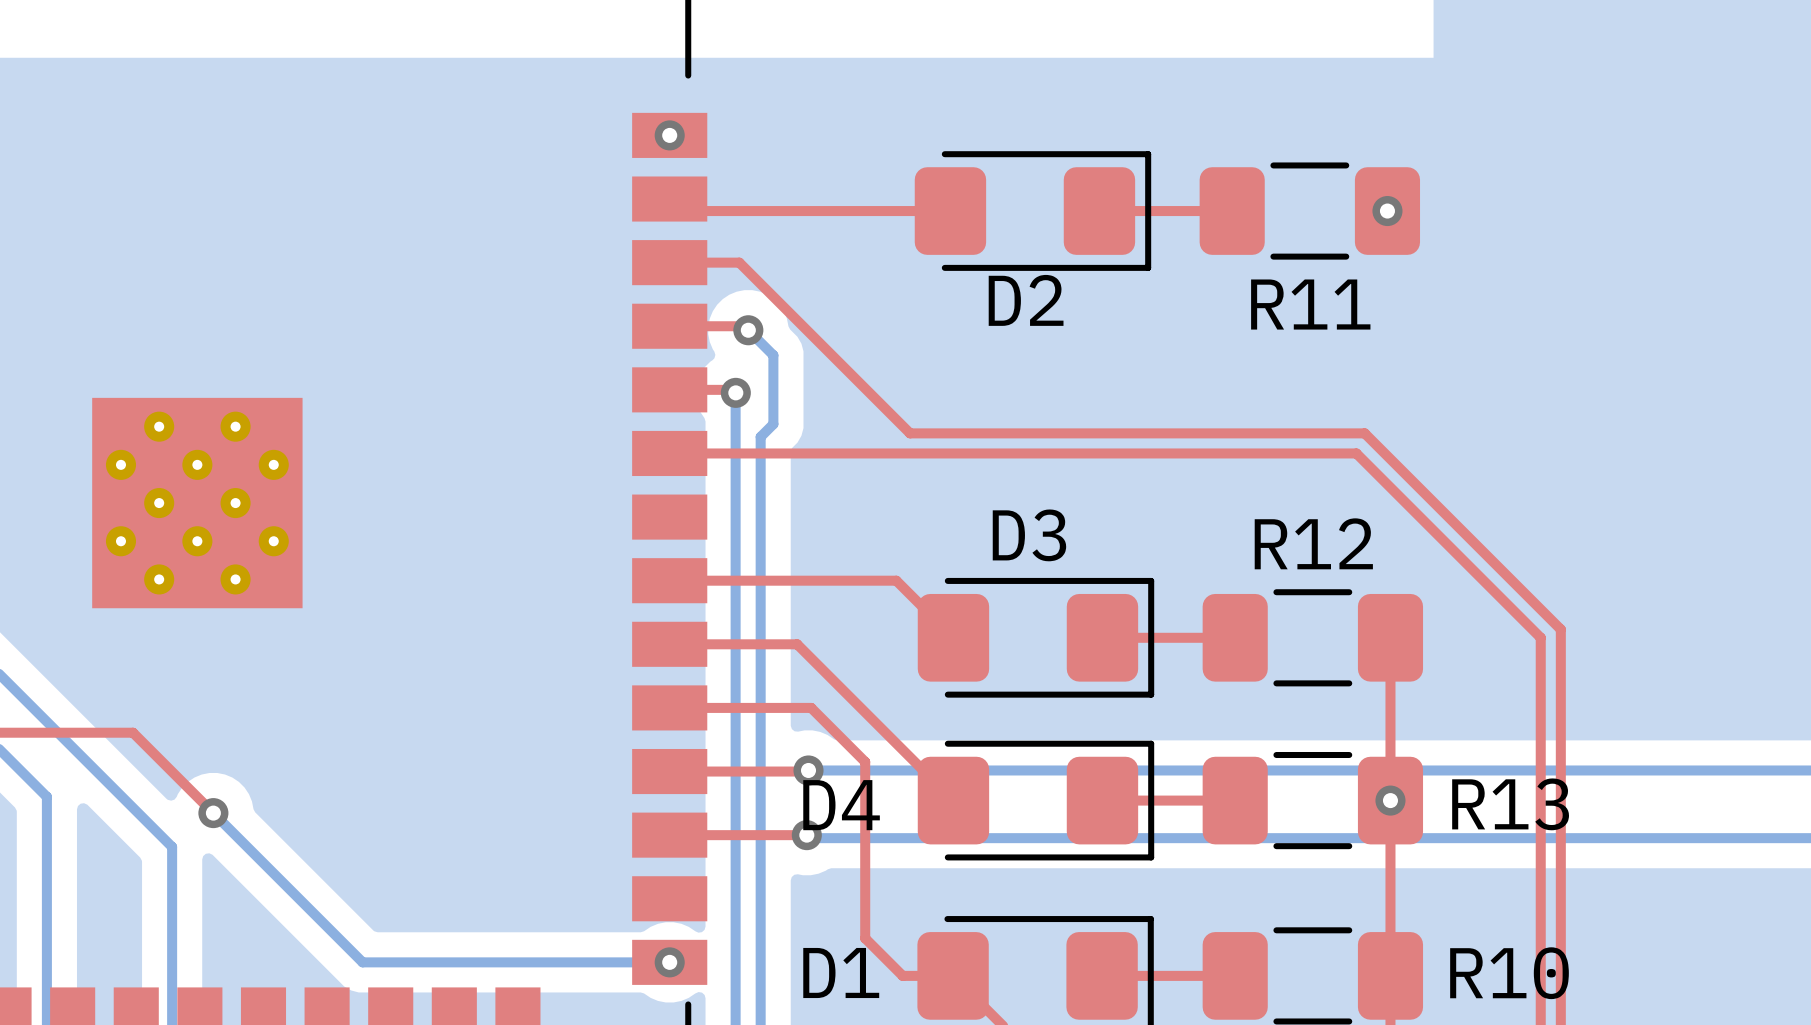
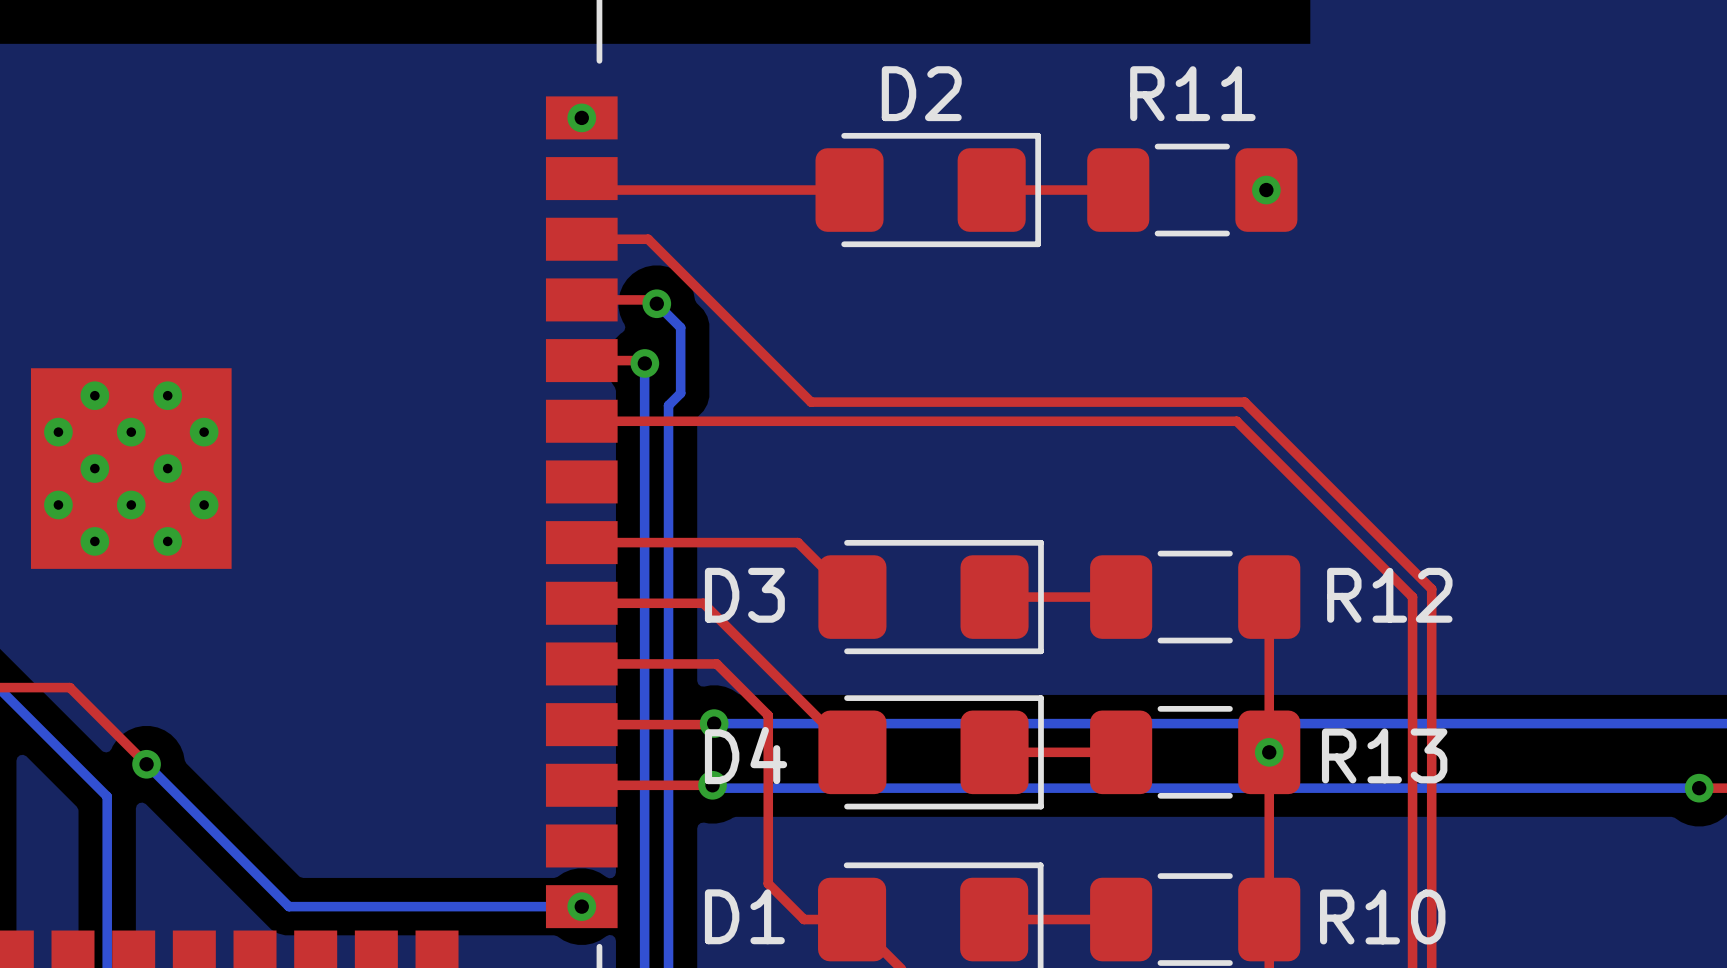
D2 name position: D2 (1026, 300) -> D2 (921, 93)
R11 name position: R11 (1310, 304) -> R11 (1192, 93)
D3 name position: D3 (1029, 535) -> D3 (744, 595)
R12 name position: R12 (1313, 543) -> R12 (1389, 595)

